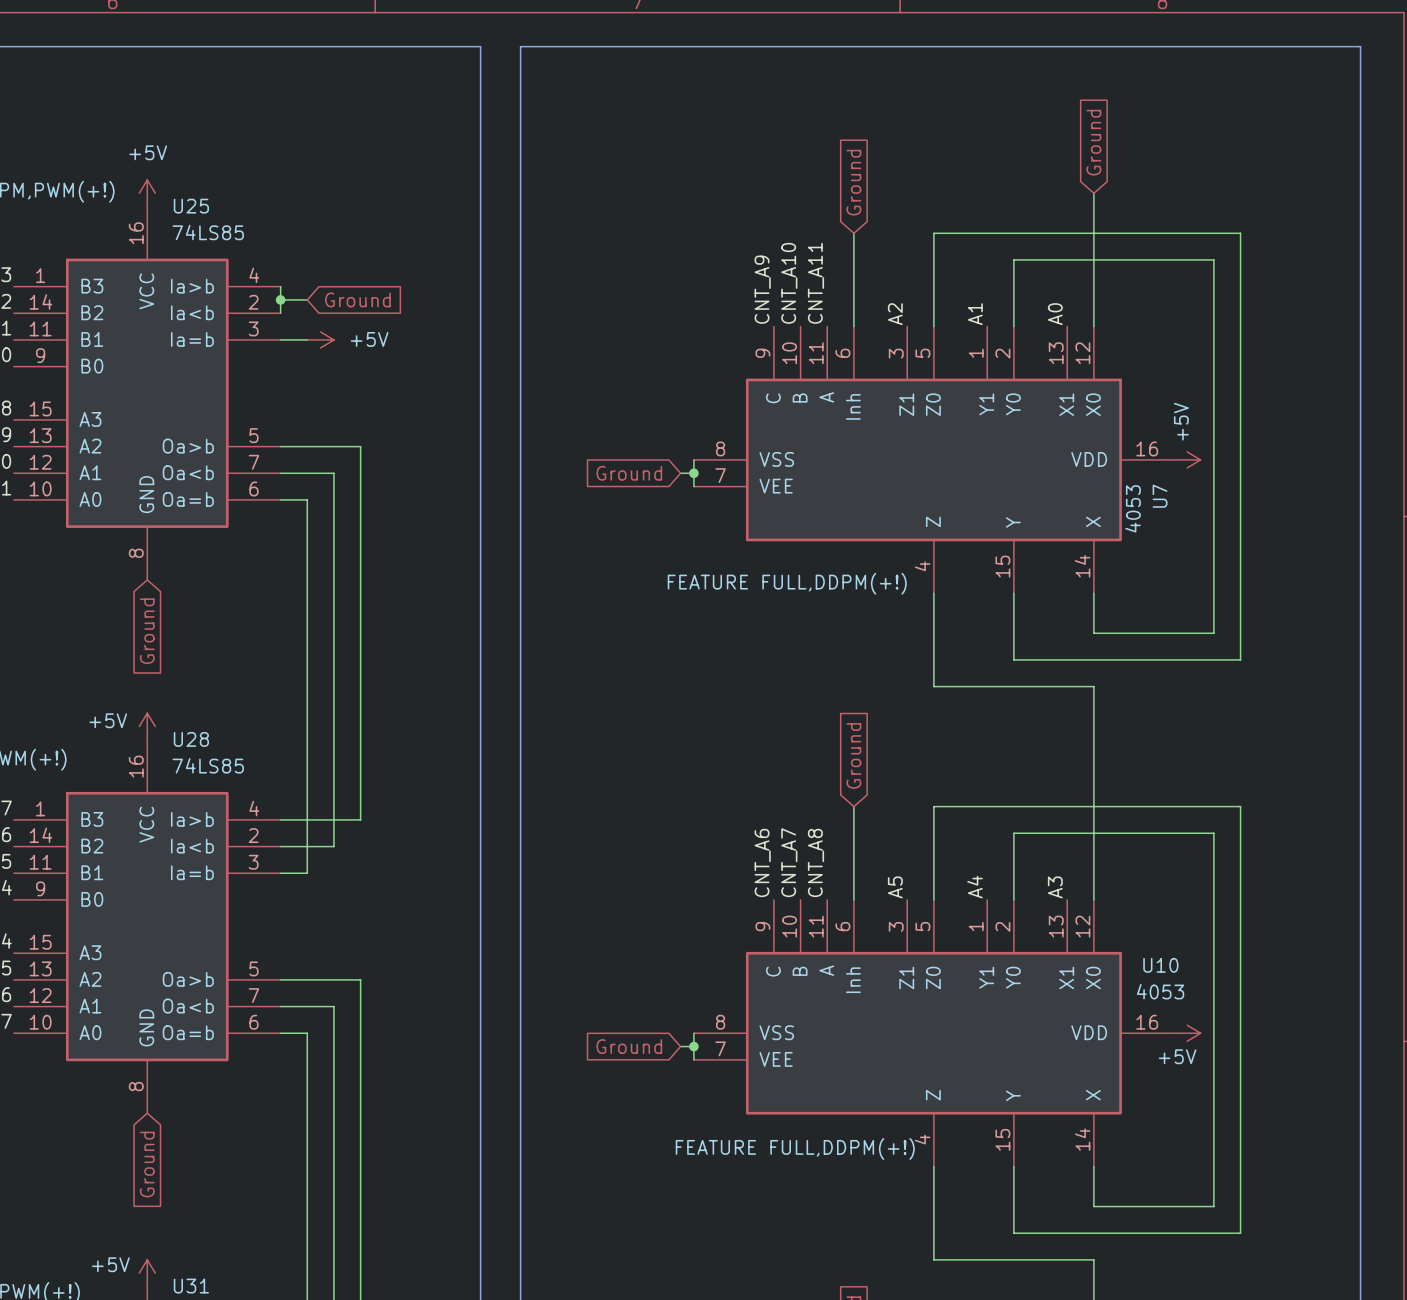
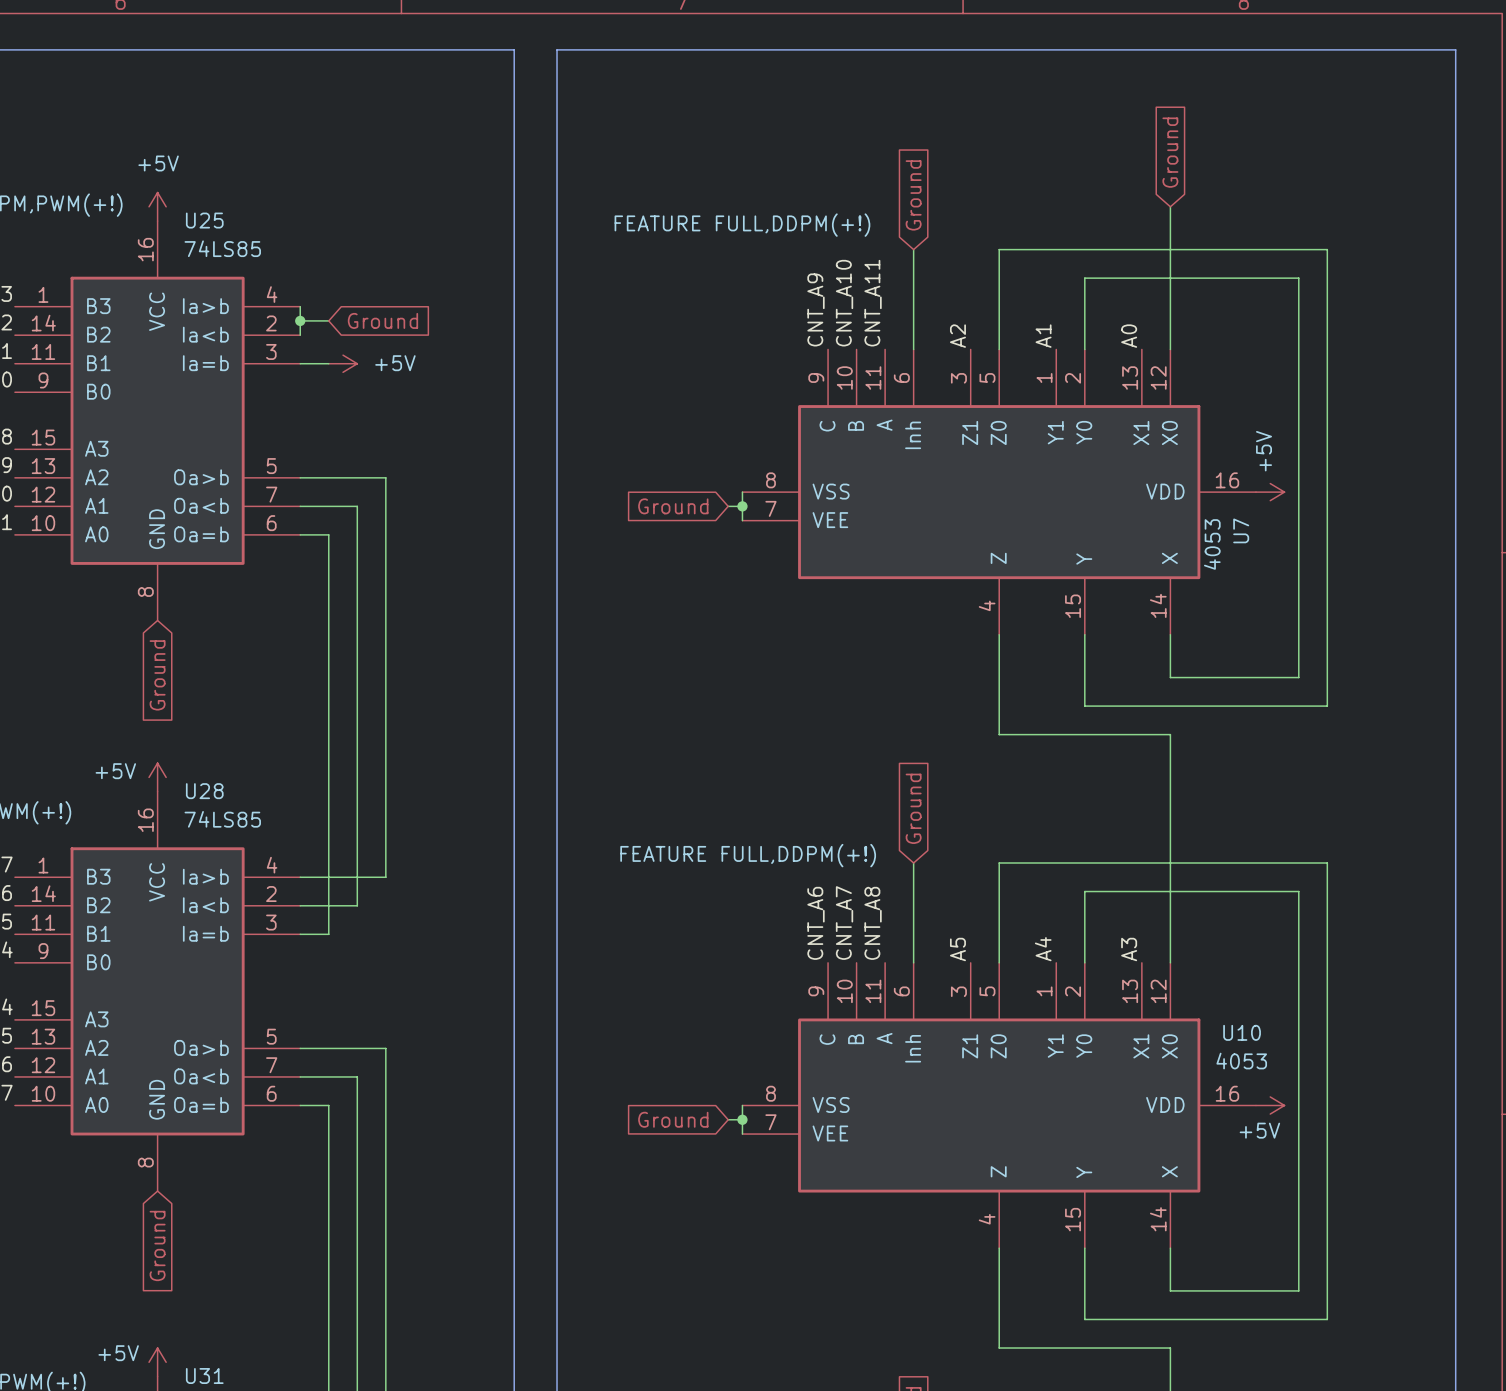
U7 text position: FEATURE FULL,DDPM(+!) (787, 583) -> FEATURE FULL,DDPM(+!) (742, 225)
U10 text position: FEATURE FULL,DDPM(+!) (795, 1148) -> FEATURE FULL,DDPM(+!) (748, 855)

